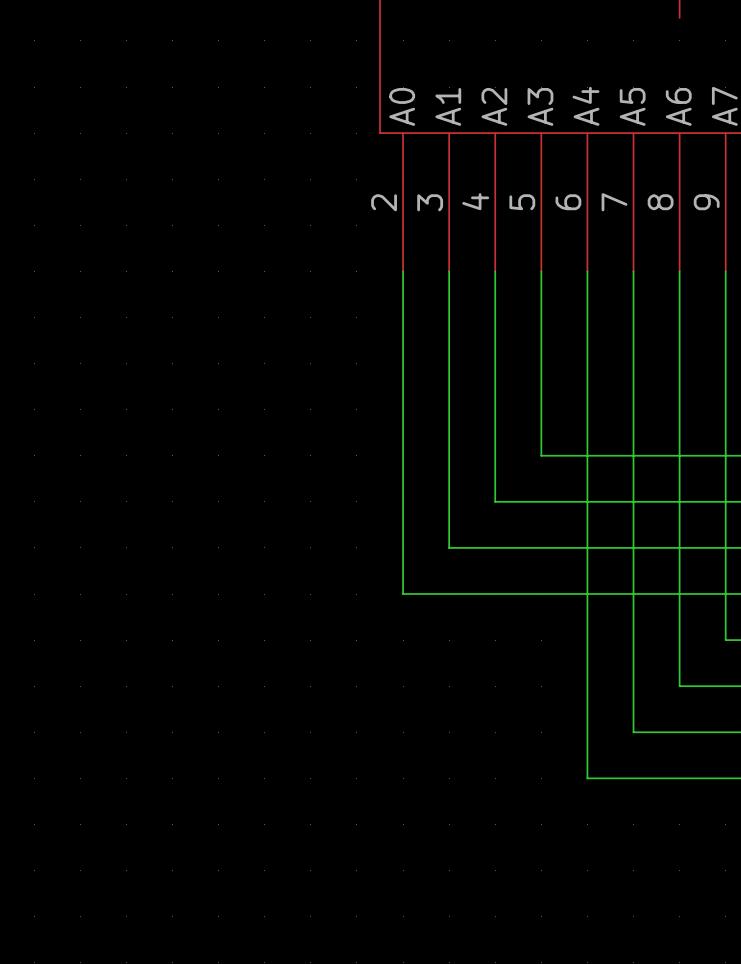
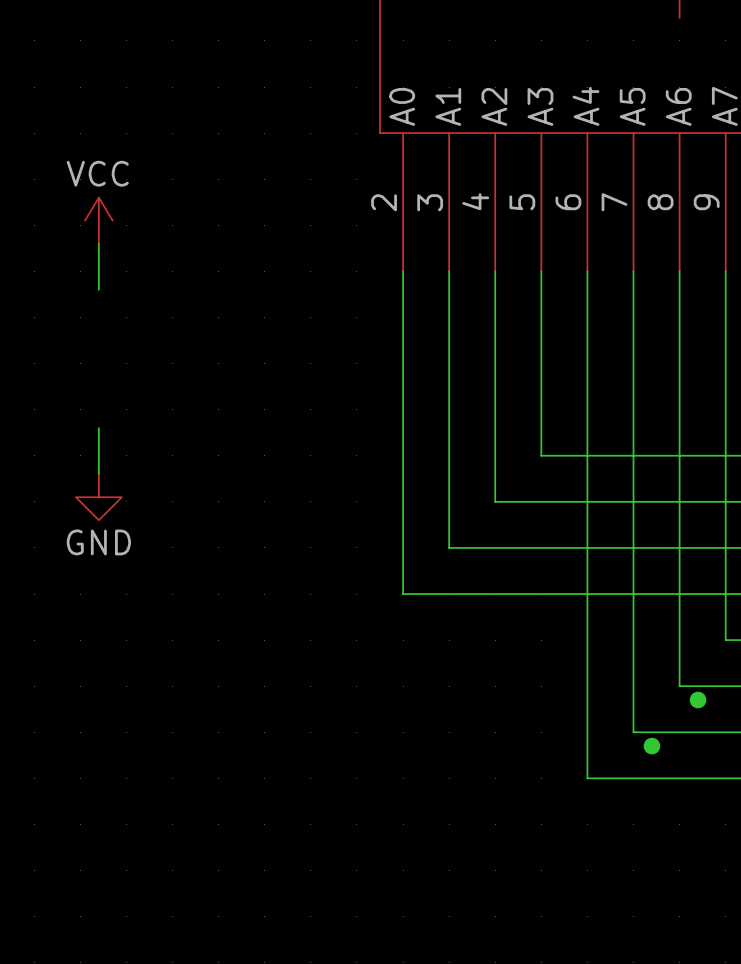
power symbol: none -> VCC (98, 220)
wire: none -> (98, 243) (98, 289)
wire: none -> (98, 428) (98, 474)
power symbol: none -> GND (98, 497)
junction: none -> (698, 700)
junction: none -> (651, 746)

